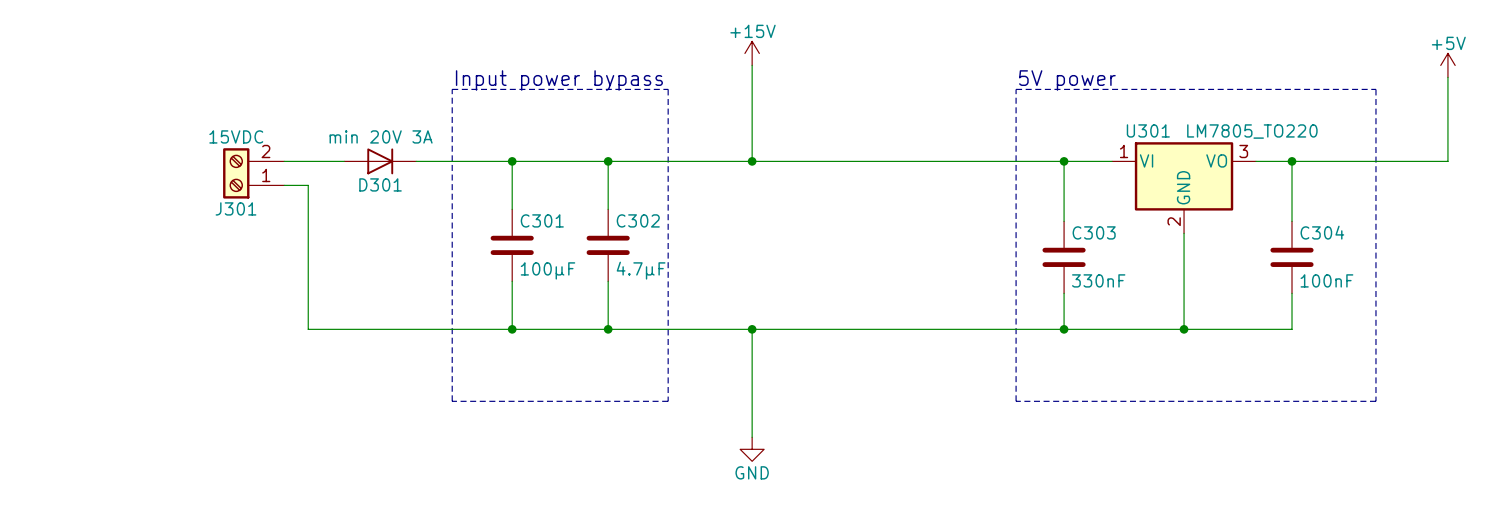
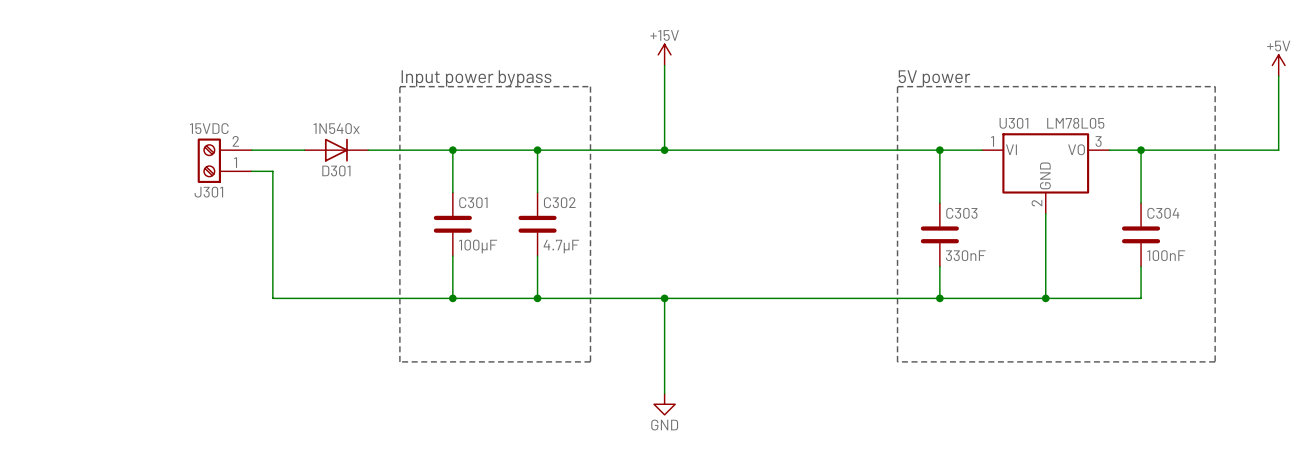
U301 value: LM7805_TO220 (1252, 131) -> LM78L05 (1075, 123)
D301 value: min 20V 3A (381, 136) -> 1N540x (336, 128)

